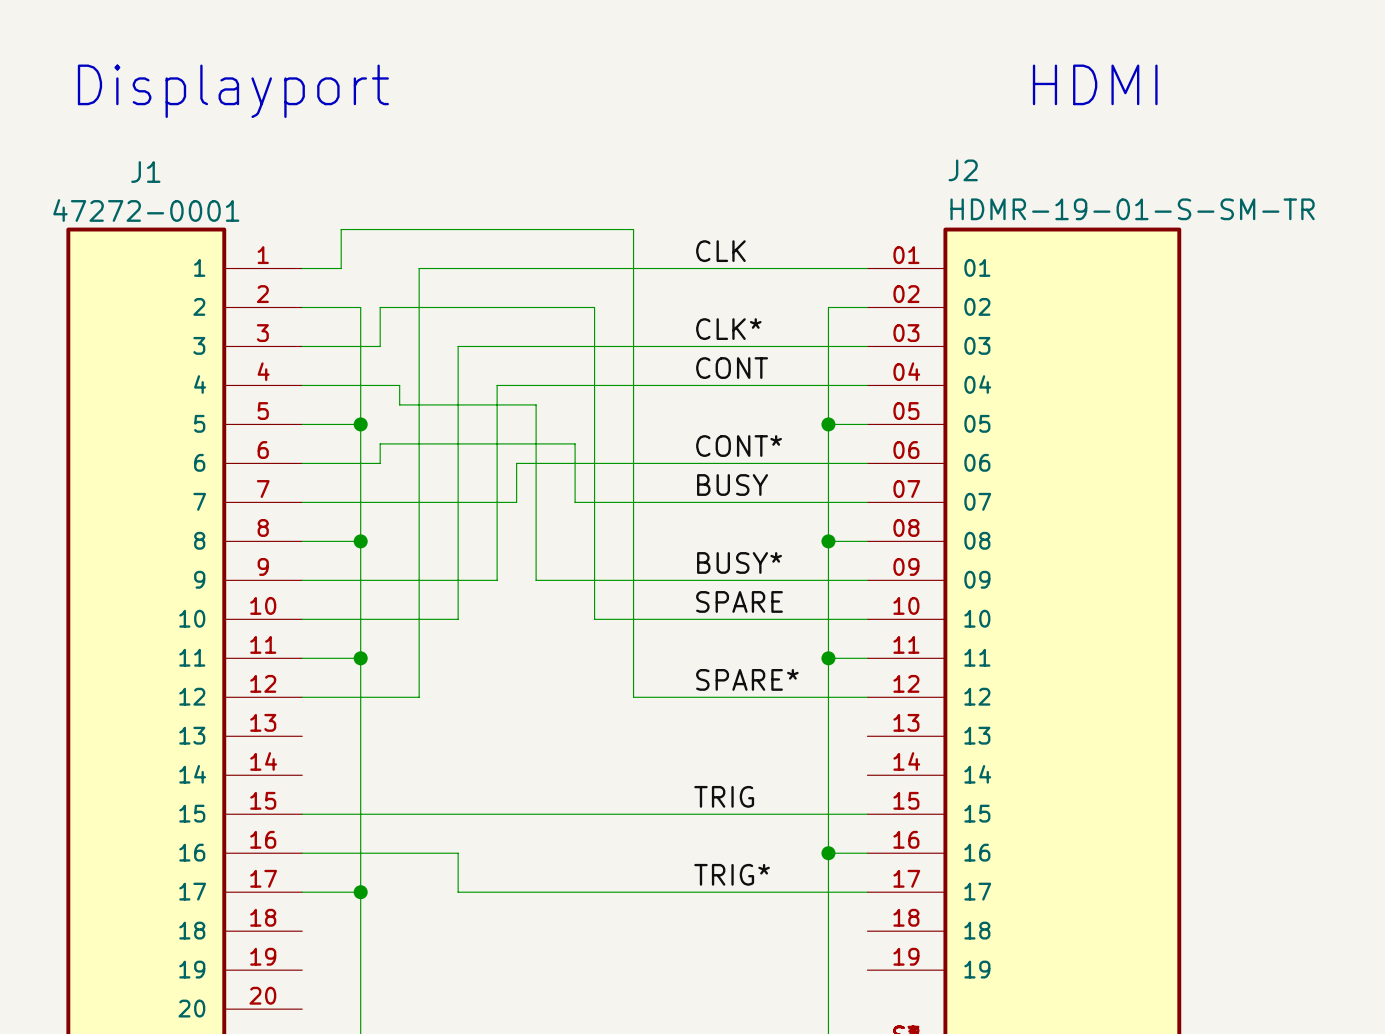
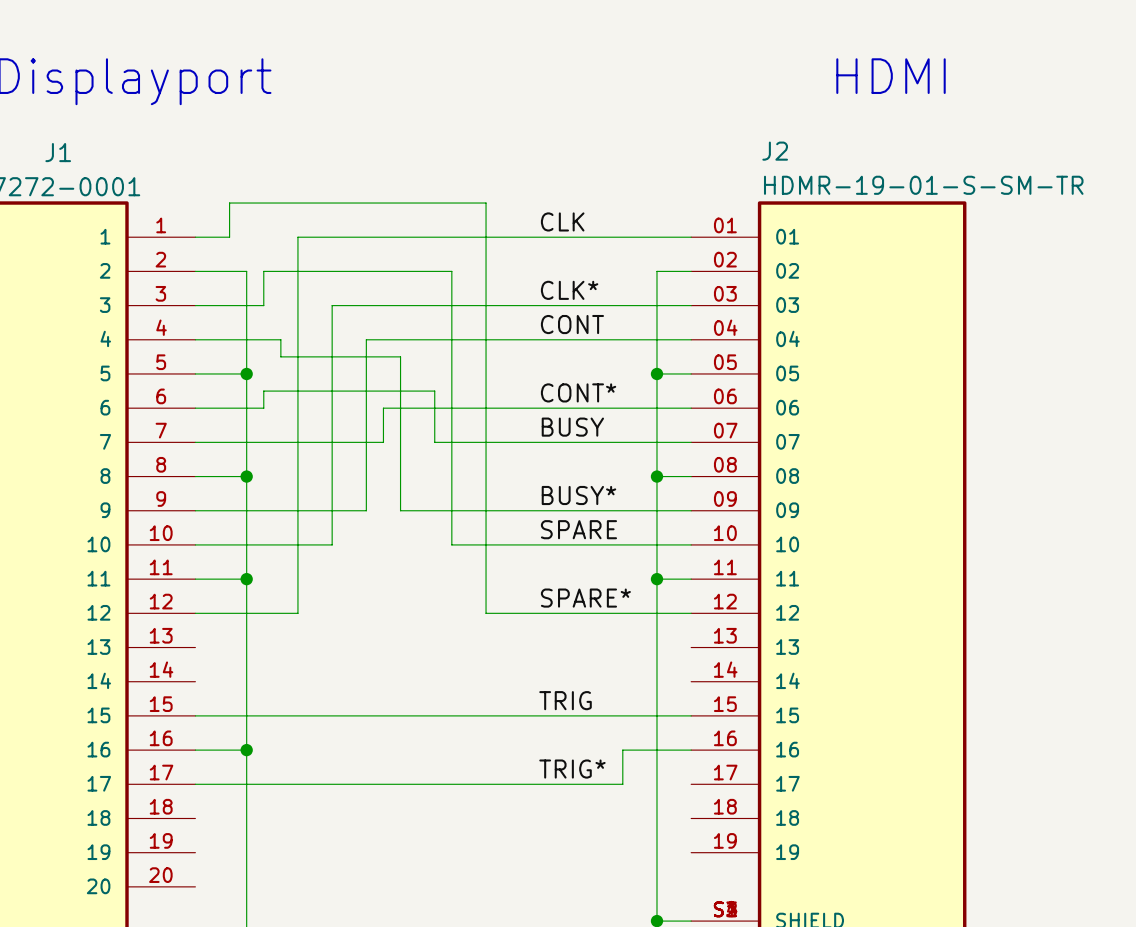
wire: (360, 853) (458, 853) (458, 892) -> (246, 784) (332, 784)
junction: (828, 853) -> none
junction position: (360, 892) -> (246, 750)
wire: (789, 892) (867, 892) -> (622, 784) (622, 750) (656, 750)

